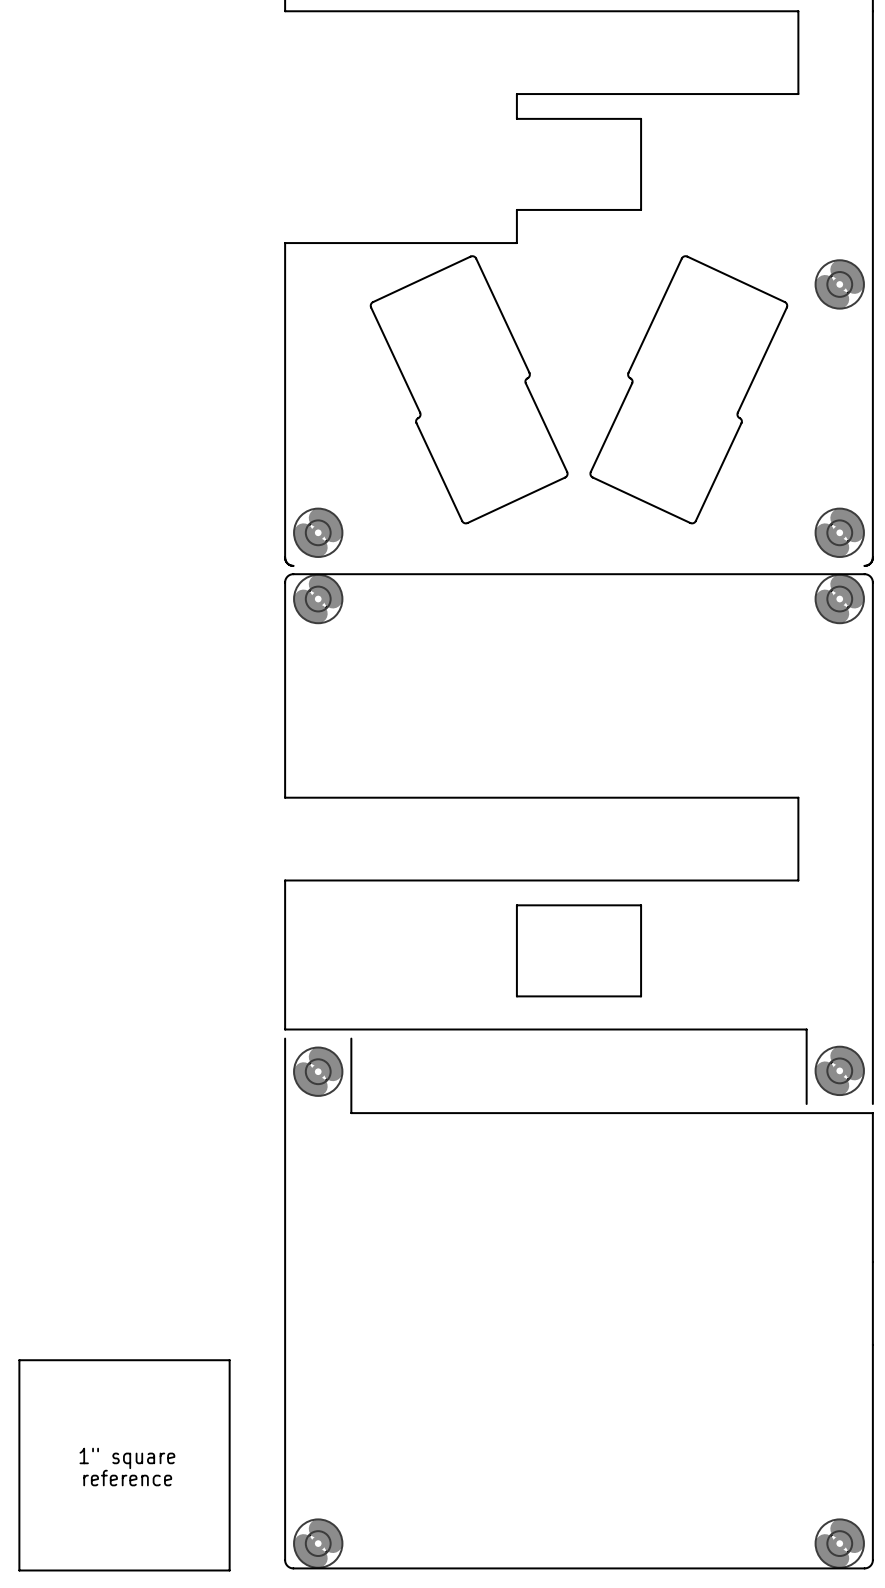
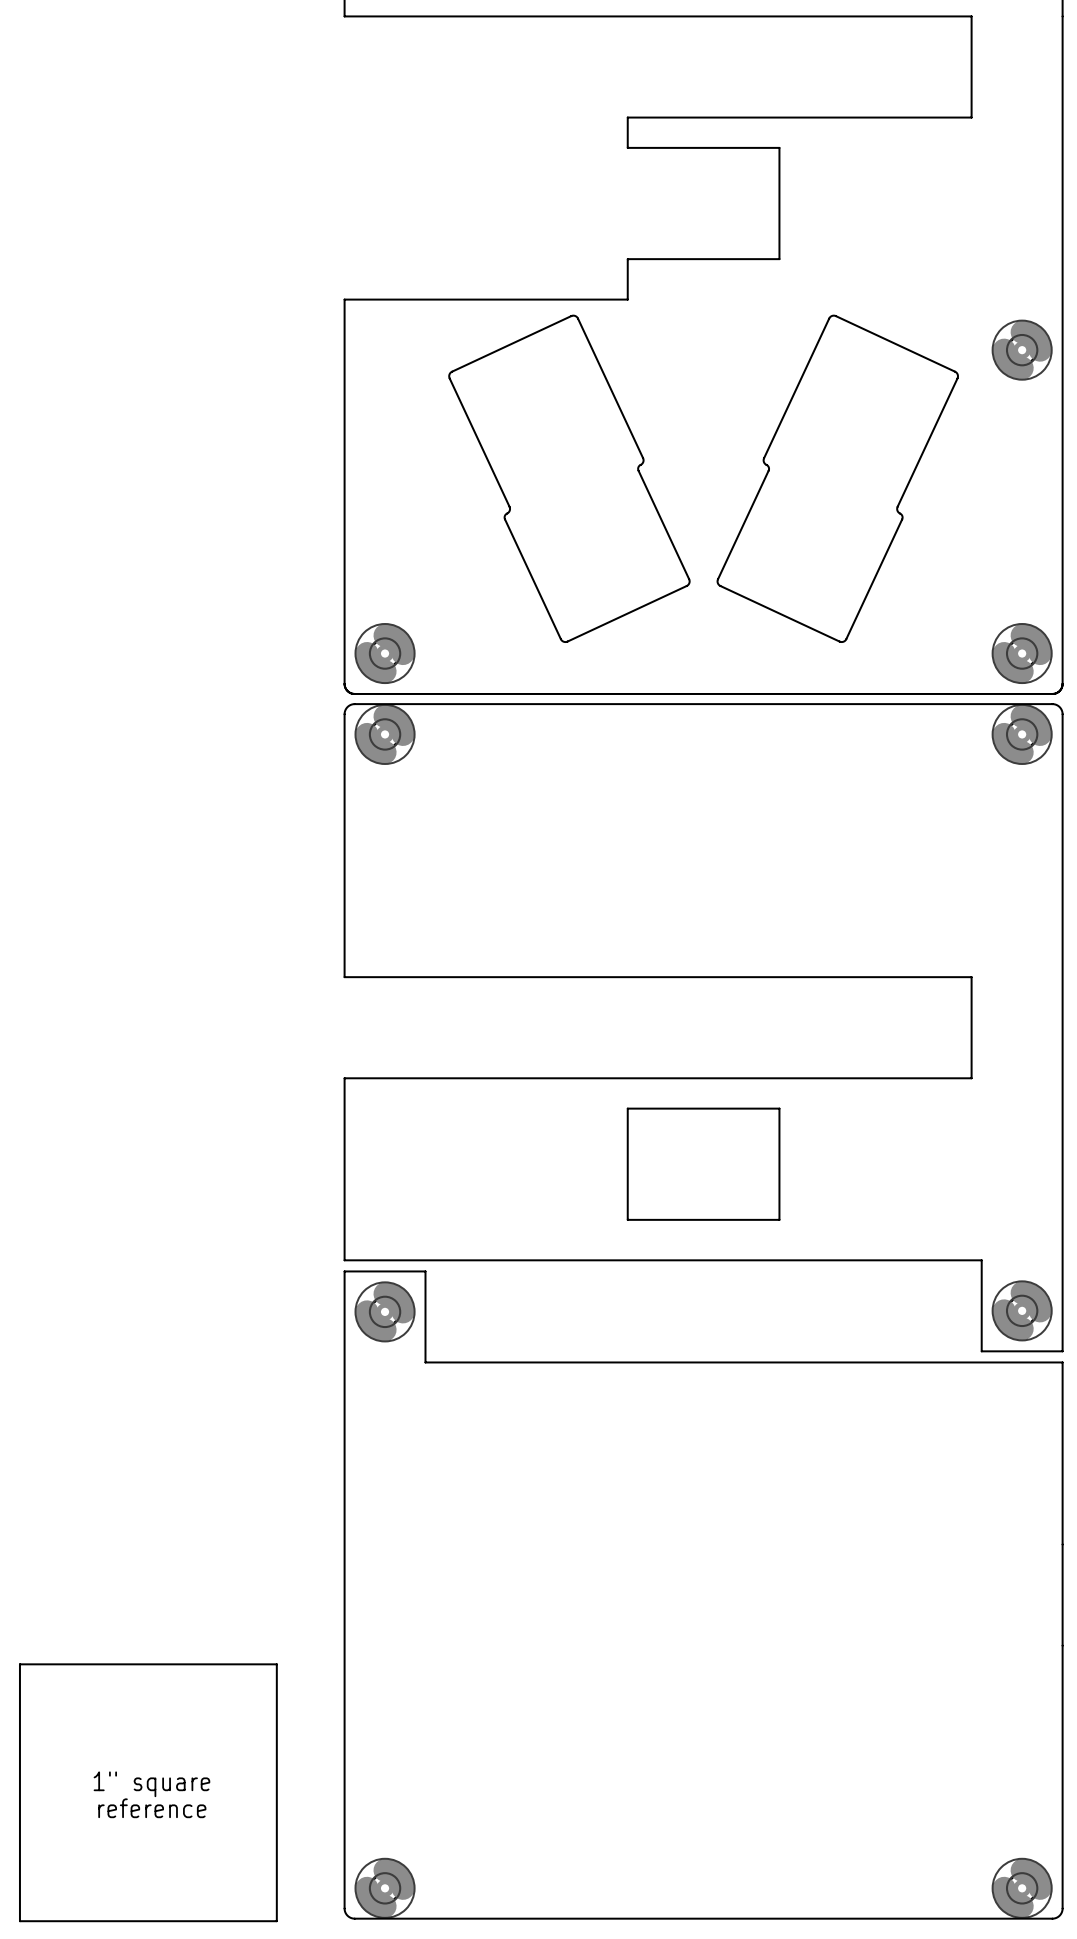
board edge: none -> (354, 693) (1052, 693)
board edge: none -> (344, 1271) (425, 1271)
board edge: none -> (981, 1351) (1062, 1351)

